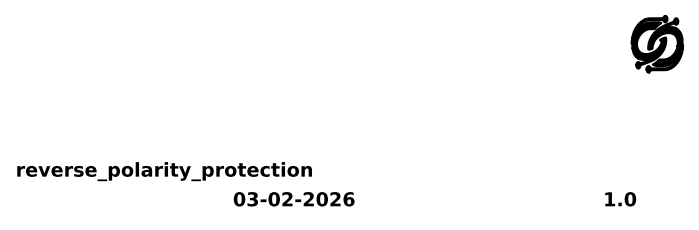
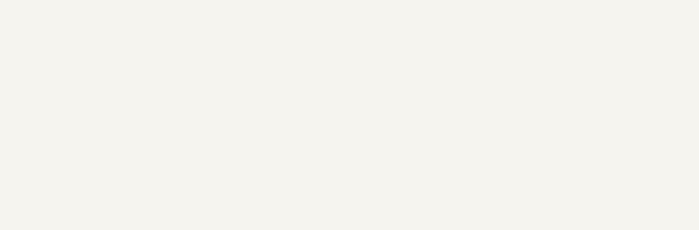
power symbol: (657, 44) -> none
text: reverse_polarity_protection (164, 171) -> none
text: 03-02-2026 (294, 199) -> none
text: 1.0 (620, 199) -> none

